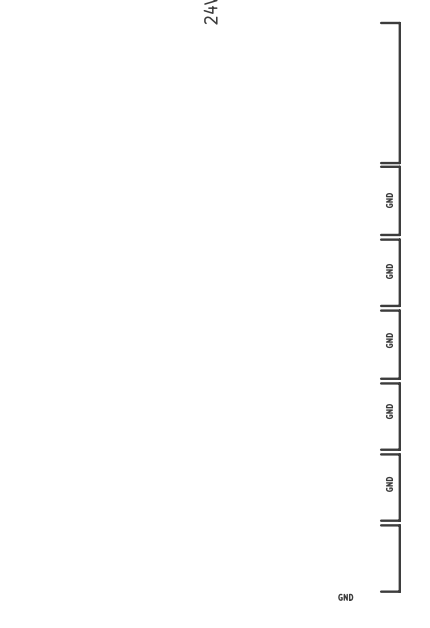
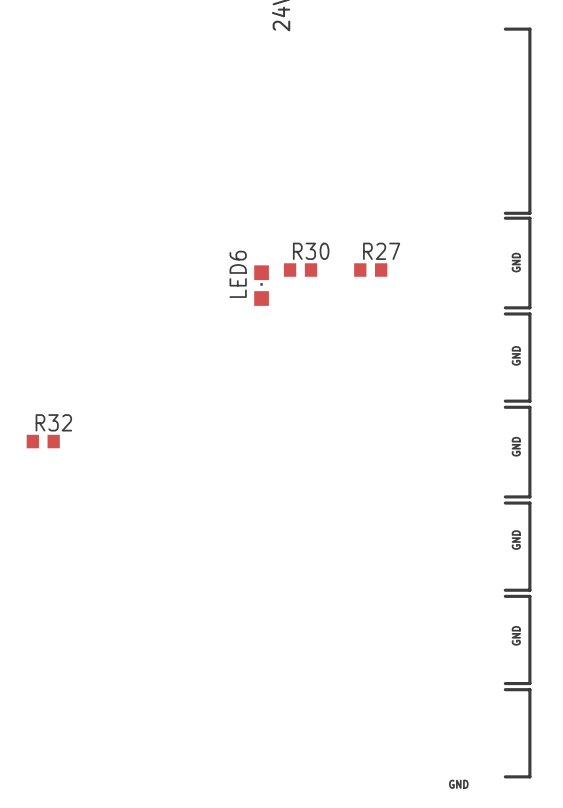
R30: none -> (300, 270)
R27: none -> (370, 270)
LED6: none -> (261, 285)
R32: none -> (43, 441)

